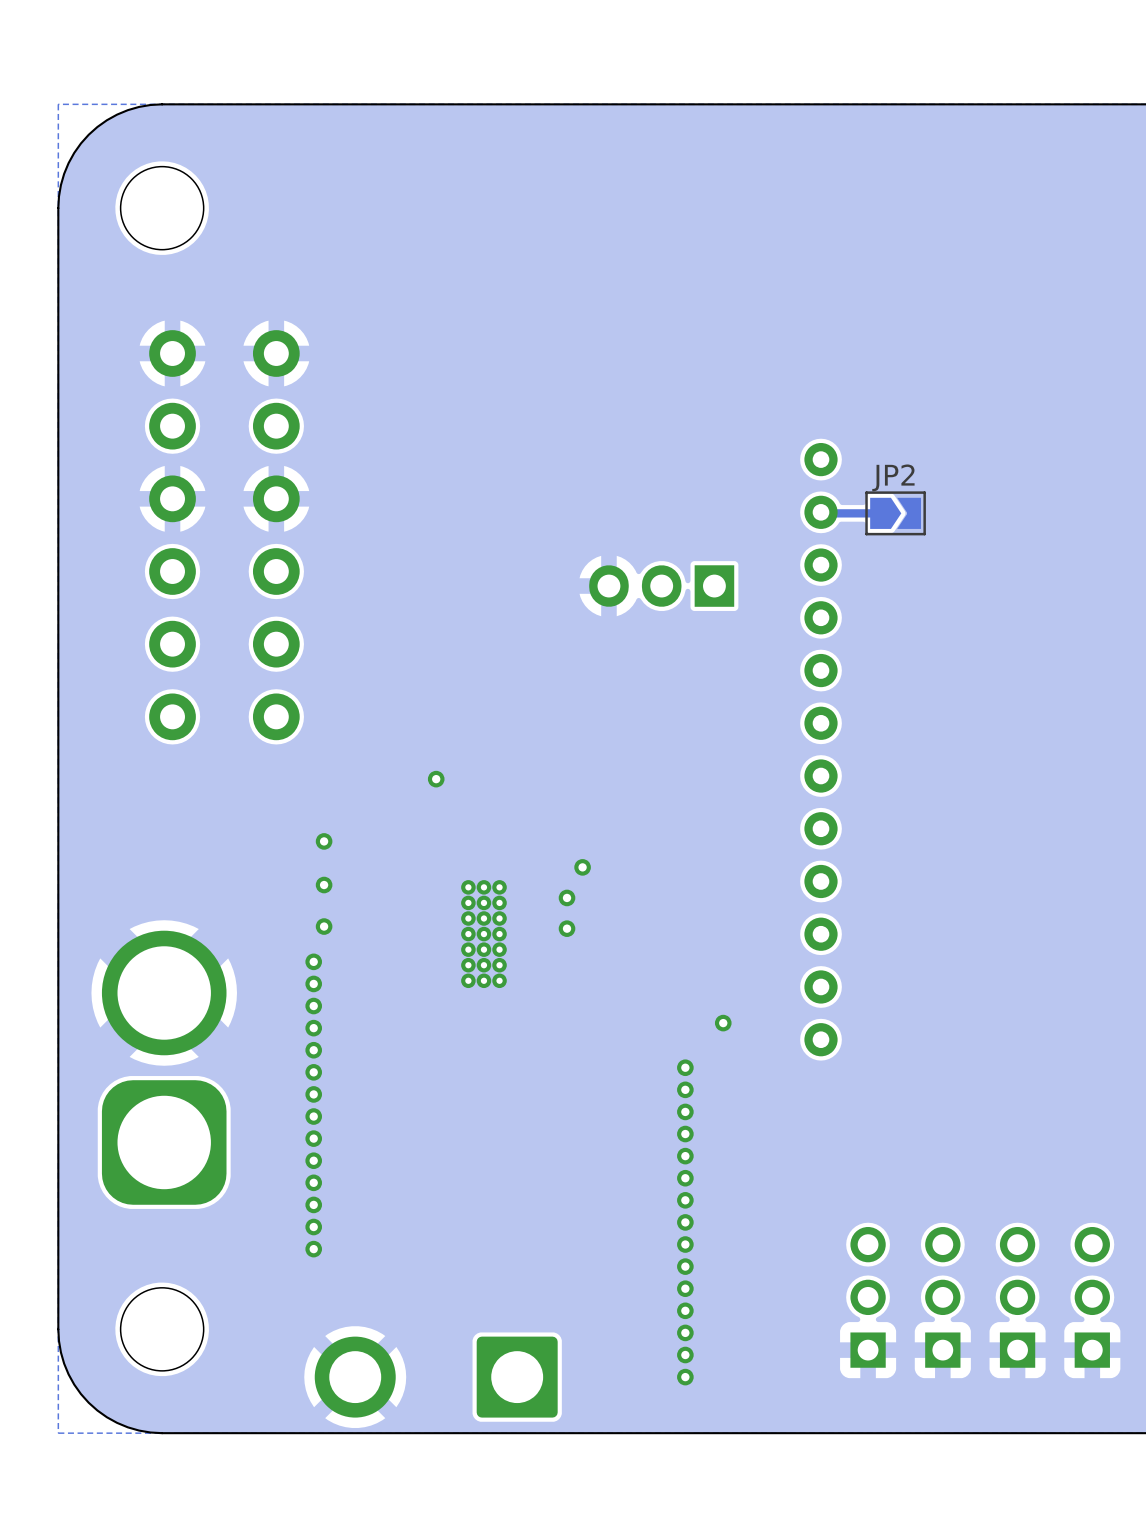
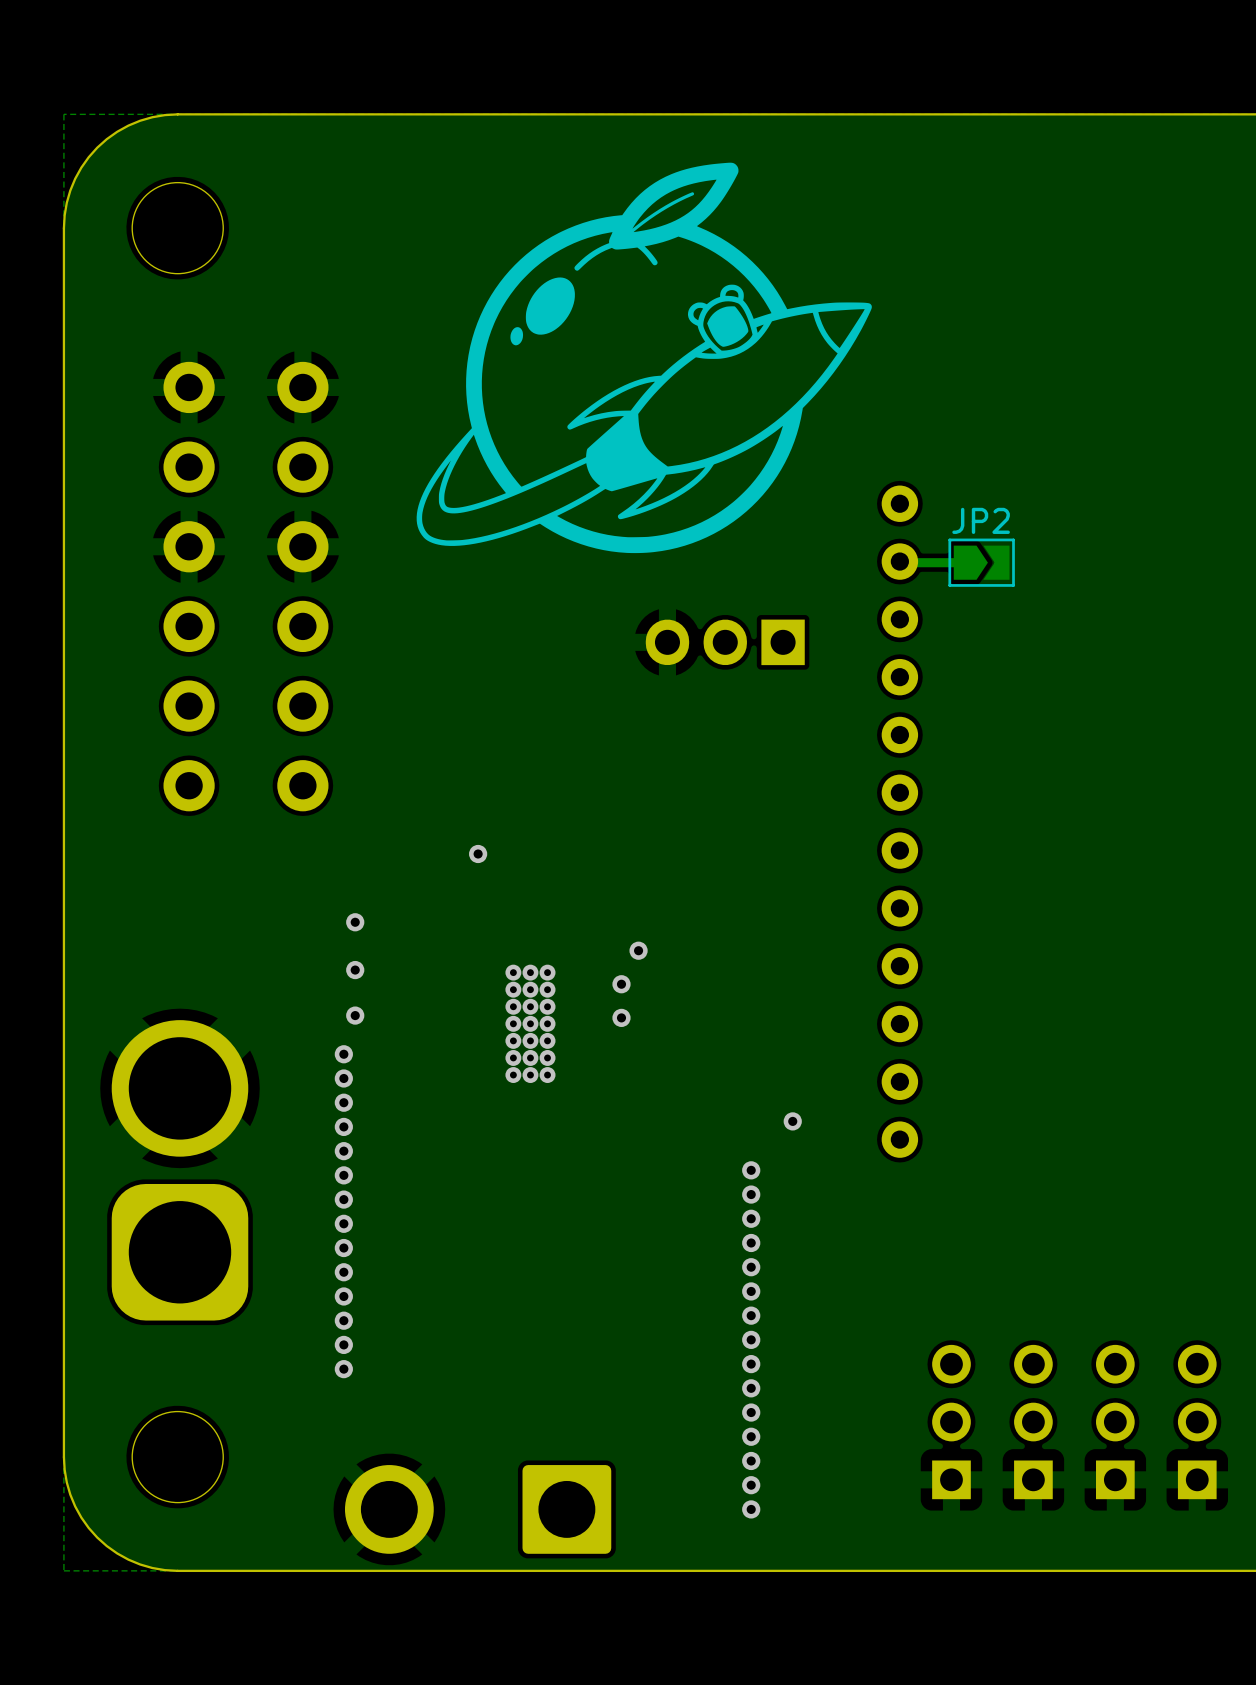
drawing: none -> [416, 162, 872, 554]

